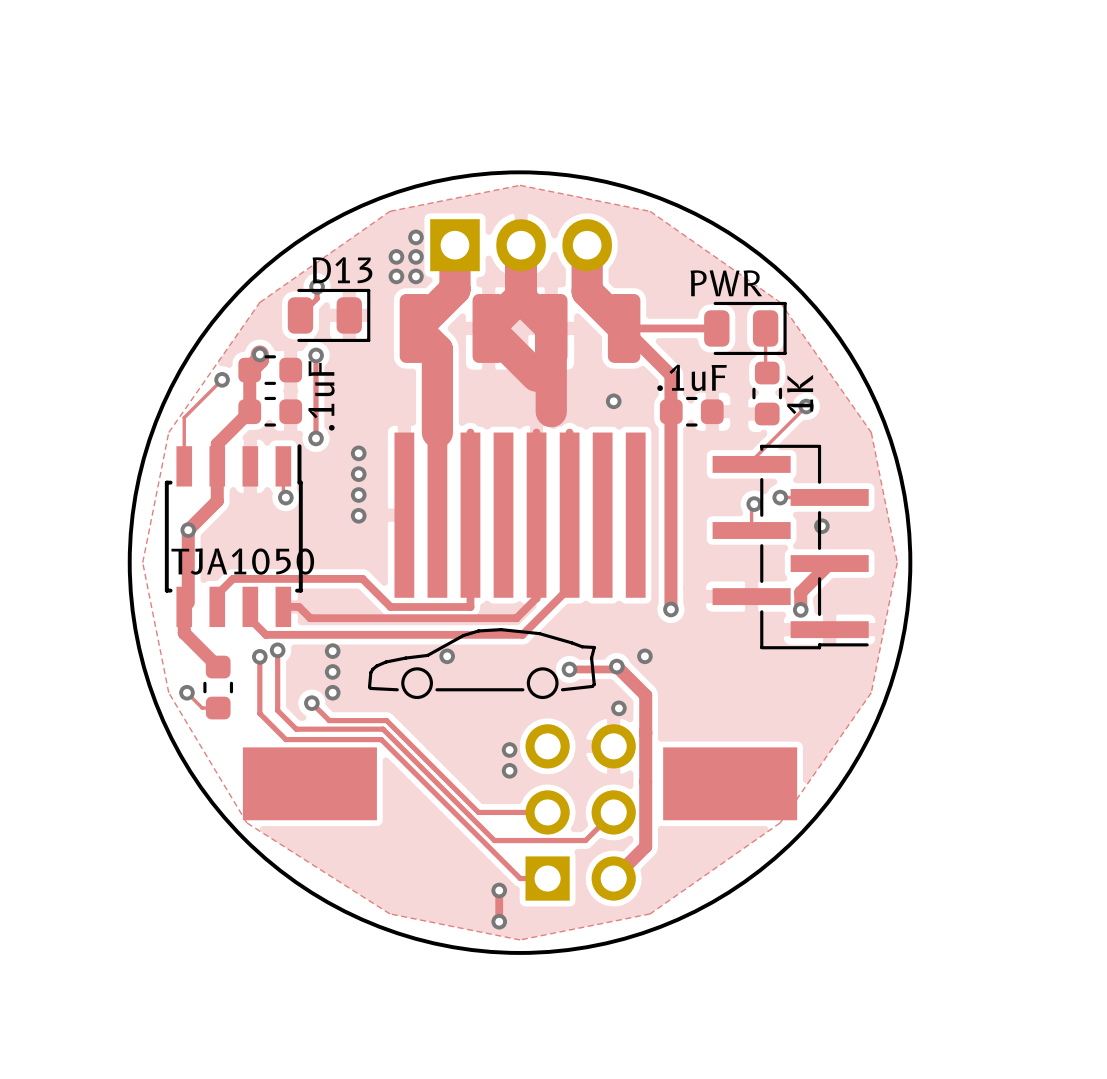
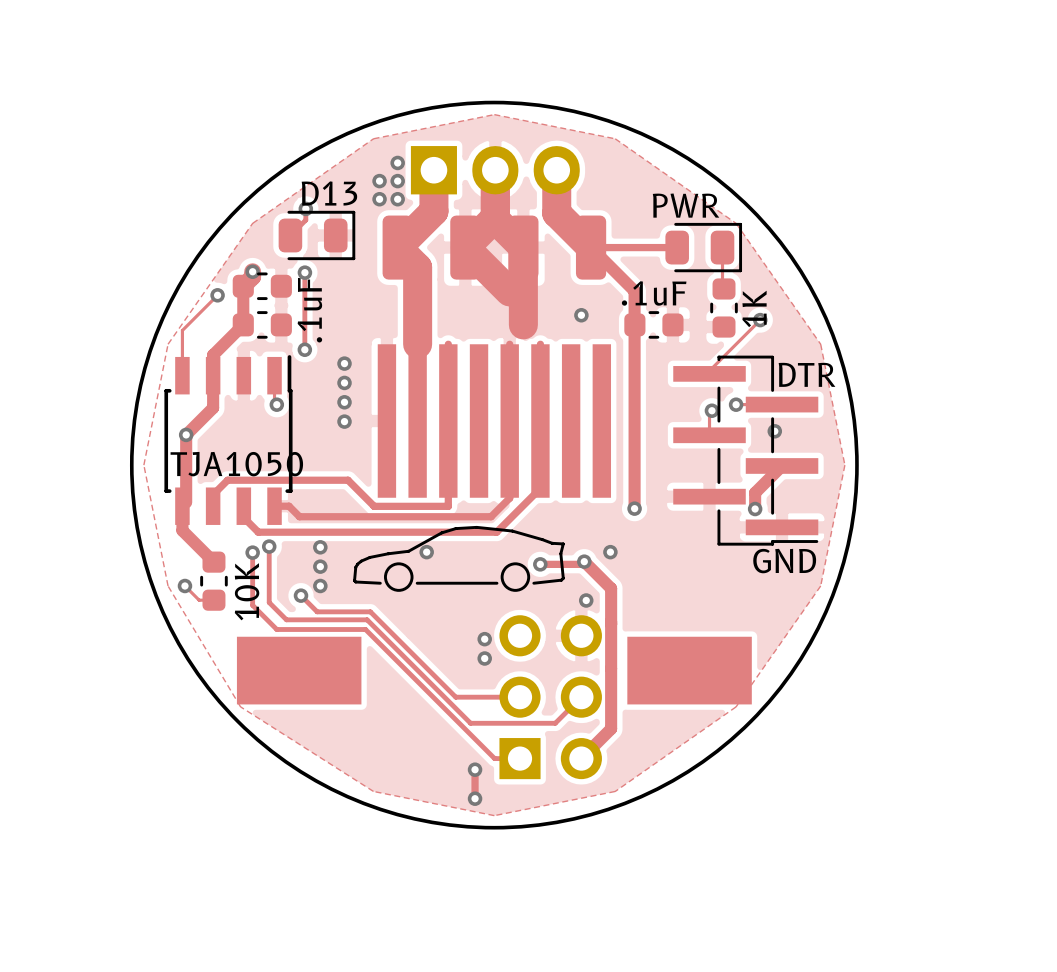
text: none -> DTR (807, 374)
text: none -> GND (784, 561)
part value: none -> 10K (247, 591)

